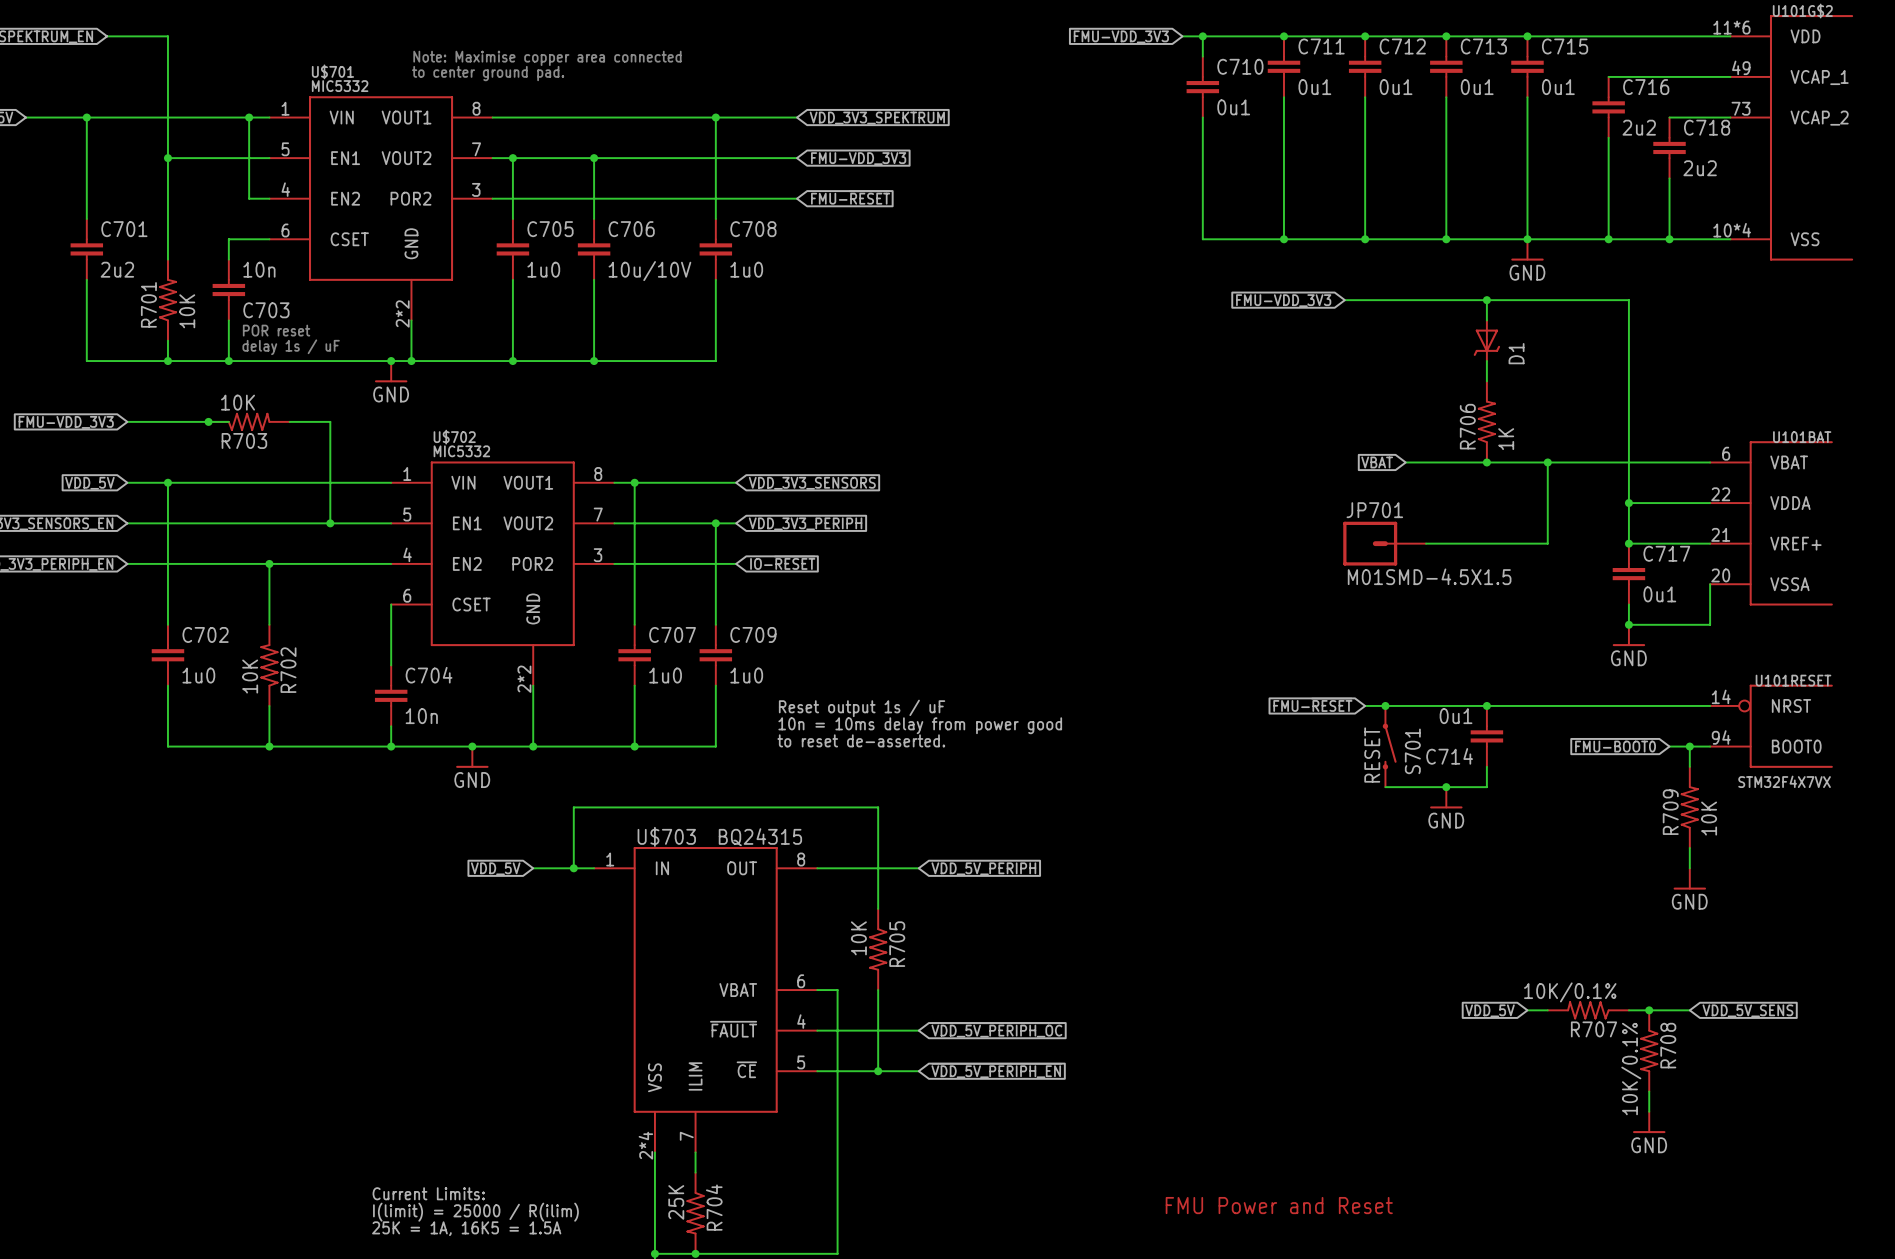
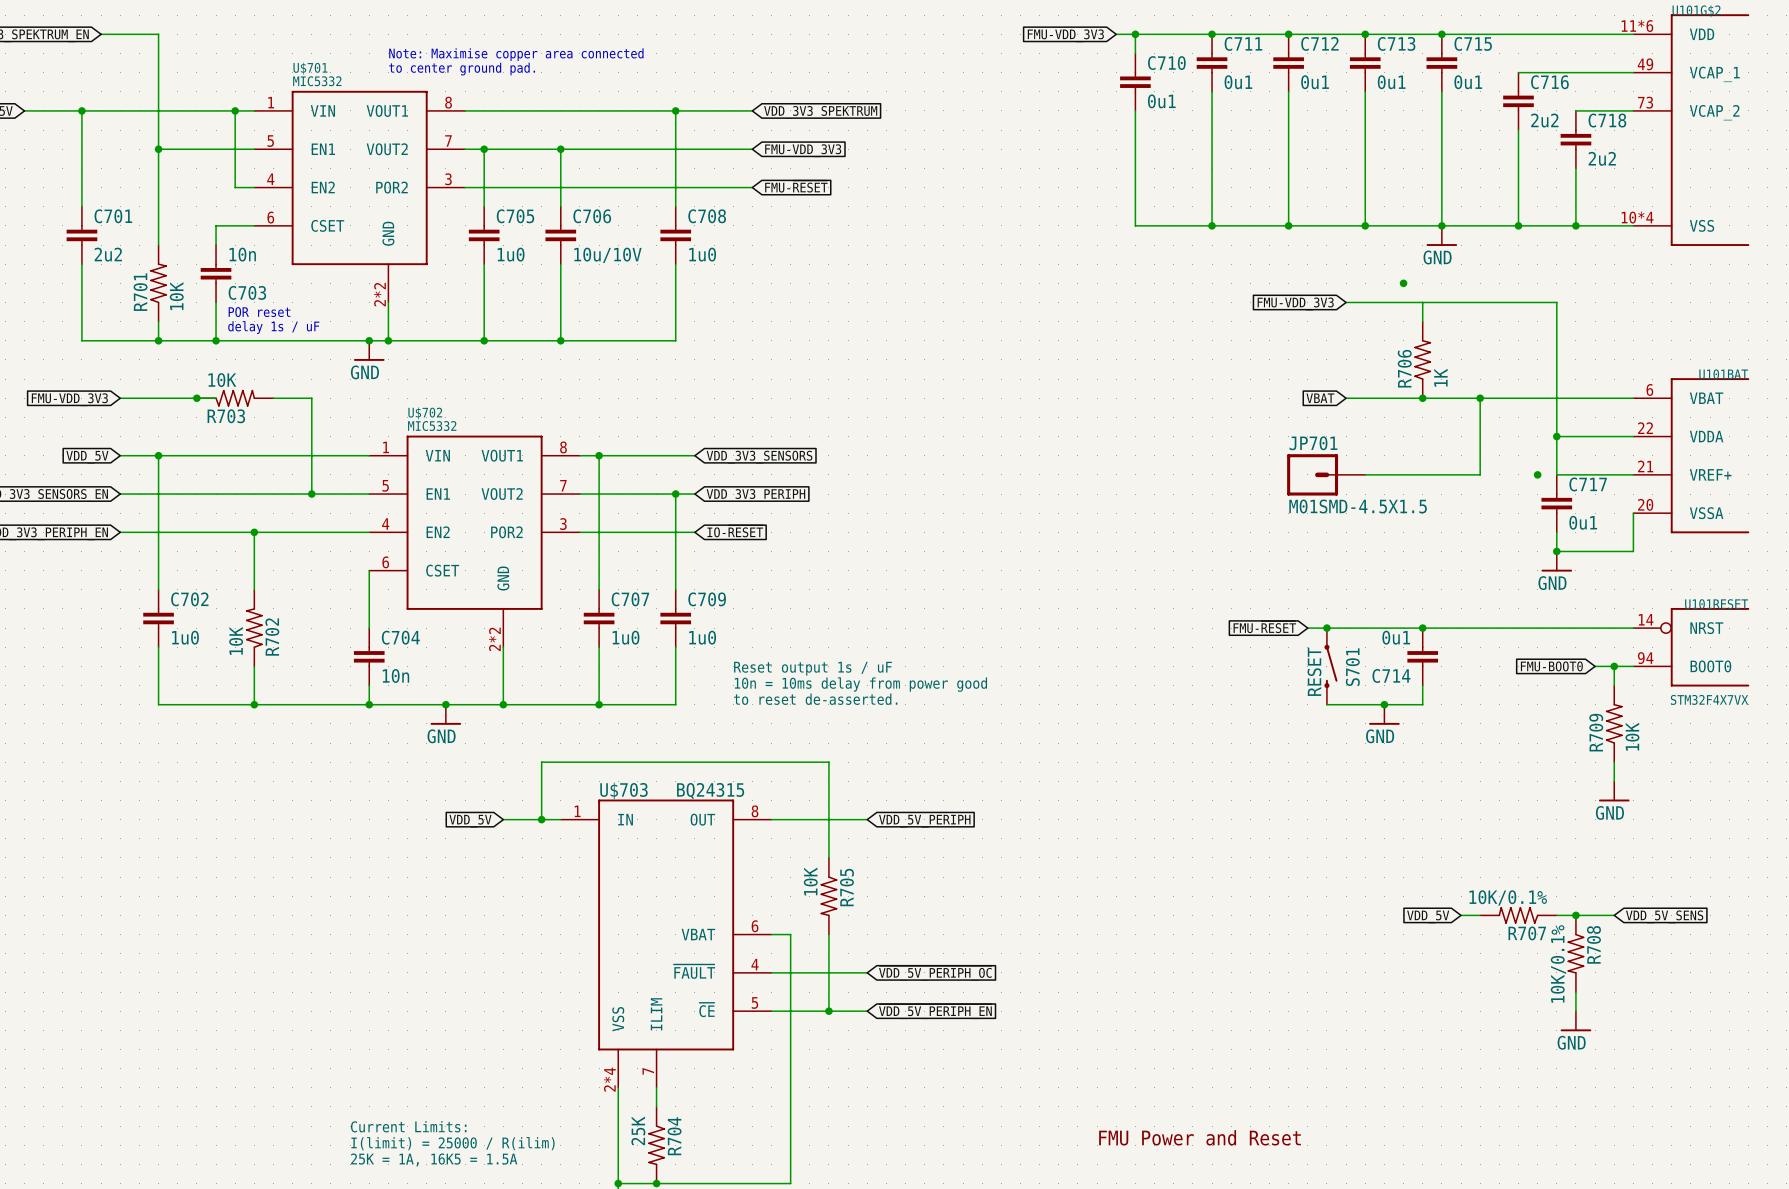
global label position: FMU-VDD_3V3 (1283, 300) -> FMU-VDD_3V3 (1295, 303)
wire: (1344, 300) (1628, 300) (1628, 543) (1710, 543) -> none
wire: (1486, 300) (1486, 320) -> none
D1: (1486, 340) -> none
wire: (1486, 361) (1486, 381) -> (1422, 302) (1422, 321)
wire: none -> (1346, 398) (1633, 398)
R706 position: (1486, 421) -> (1422, 359)
junction: none -> (1422, 398)
junction: none -> (1480, 398)
global label position: VBAT (1377, 462) -> VBAT (1320, 398)
wire: (1405, 462) (1649, 462) -> none
junction: (1486, 462) -> none
wire: (1547, 462) (1547, 543) (1426, 543) -> (1480, 398) (1480, 474) (1365, 474)
junction: (1547, 462) -> none
junction: none -> (1556, 436)
wire: (1628, 503) (1649, 503) -> (1346, 302) (1556, 302) (1556, 474)
U101BAT position: (1771, 523) -> (1691, 455)
JP701 position: (1384, 543) -> (1326, 474)
junction: (1628, 543) -> none
C717 position: (1628, 574) -> (1556, 503)
junction: none -> (1556, 551)
wire: (1710, 584) (1710, 624) (1628, 624) (1628, 604) -> (1633, 513) (1633, 551) (1556, 551) (1556, 532)
junction: (1628, 624) -> none
power symbol position: GND (1628, 635) -> GND (1556, 561)
wire: none -> (1307, 628) (1633, 628)
junction: none -> (1326, 628)
junction: none -> (1422, 628)
global label position: FMU-~{RESET} (1312, 704) -> FMU-~{RESET} (1264, 627)
wire: (1365, 705) (1689, 705) -> none
junction: (1385, 705) -> none
junction: (1486, 705) -> none
wire: none -> (1633, 666) (1614, 666) (1614, 685)
U101RESET position: (1771, 726) -> (1691, 647)
C714 position: (1486, 736) -> (1422, 656)
S701 position: (1389, 746) -> (1330, 666)
junction: none -> (1384, 704)
global label position: FMU-BOOT0 (1615, 746) -> FMU-BOOT0 (1551, 666)
wire: (1669, 746) (1710, 746) -> none
wire: (1689, 746) (1689, 766) -> none
junction position: (1689, 746) -> (1614, 666)
wire: (1486, 766) (1486, 787) (1385, 787) -> (1422, 685) (1422, 704) (1326, 704)
junction: (1446, 787) -> none
power symbol position: GND (1446, 797) -> GND (1384, 714)
R709 position: (1689, 807) -> (1614, 723)
wire: (1689, 848) (1689, 868) -> (1614, 762) (1614, 781)
power symbol position: GND (1689, 878) -> GND (1614, 791)
global label position: VDD_5V (1489, 1010) -> VDD_5V (1428, 916)
wire: (1527, 1010) (1547, 1010) -> (1461, 915) (1480, 915)
R707 position: (1588, 1010) -> (1518, 915)
wire: (1628, 1010) (1689, 1010) -> (1556, 915) (1614, 915)
junction position: (1649, 1010) -> (1575, 915)
global label position: VDD_5V_SENS (1747, 1010) -> VDD_5V_SENS (1664, 916)
R708 position: (1649, 1050) -> (1575, 953)
wire: (1649, 1091) (1649, 1111) -> (1575, 992) (1575, 1011)
power symbol position: GND (1649, 1122) -> GND (1575, 1021)

